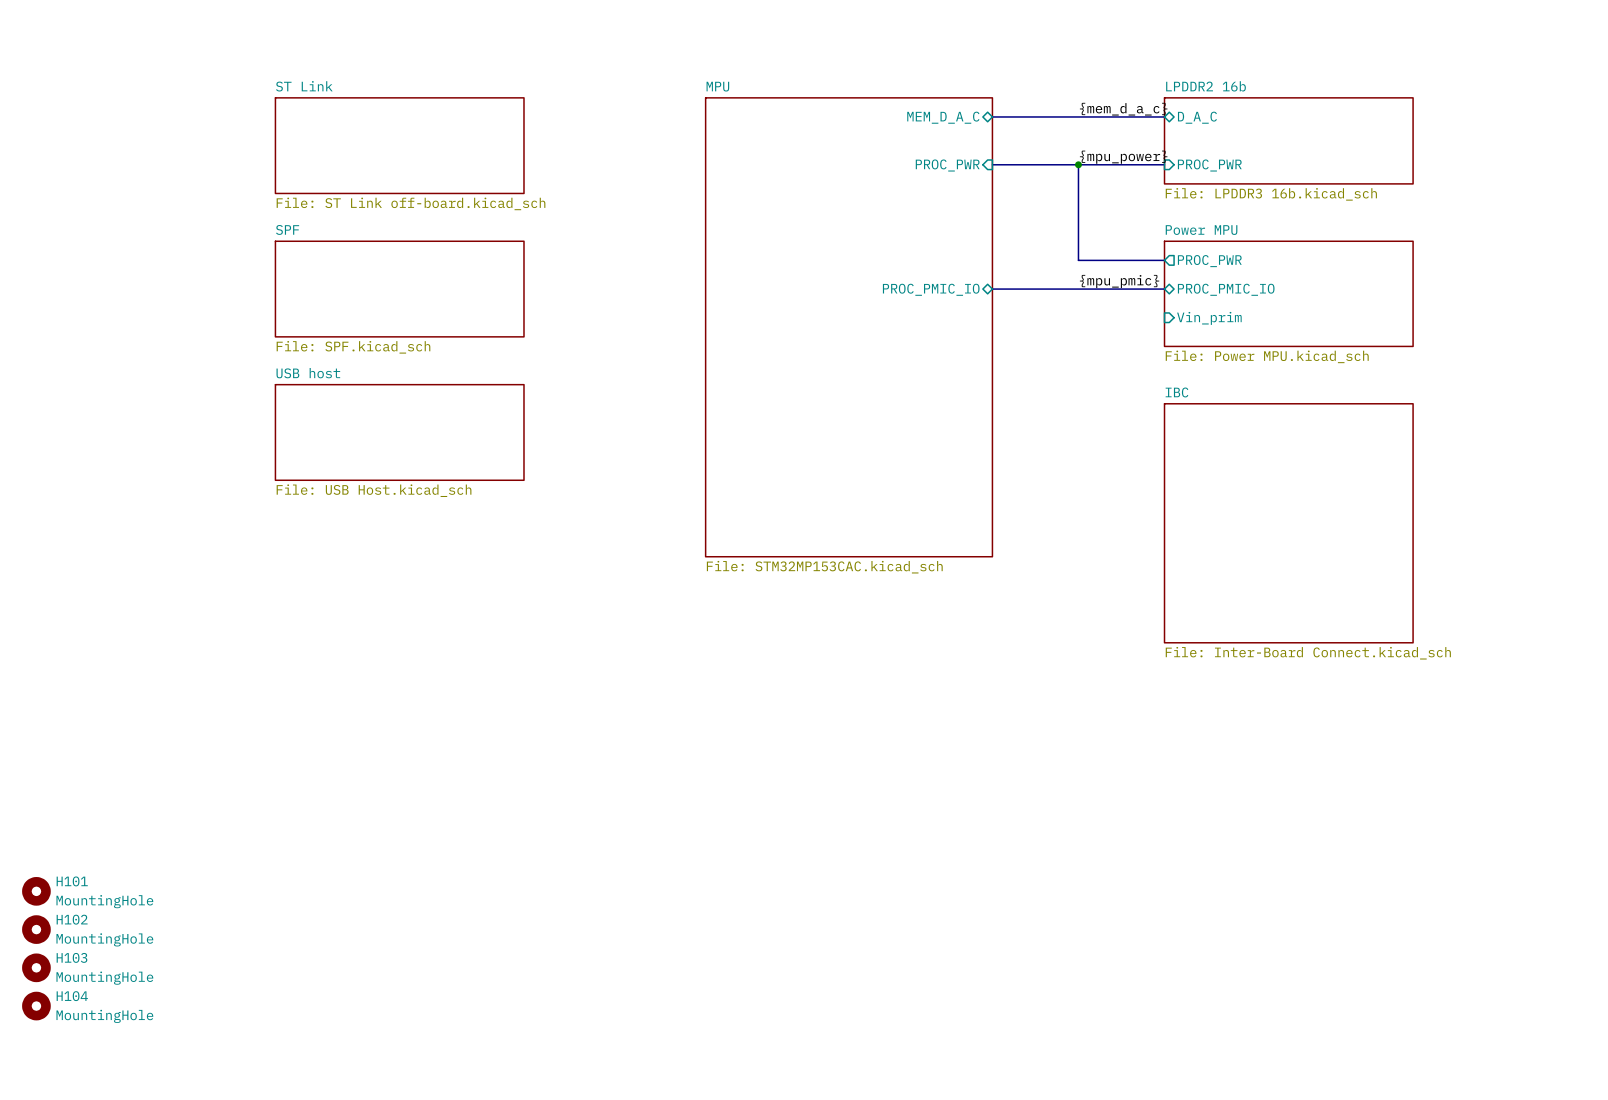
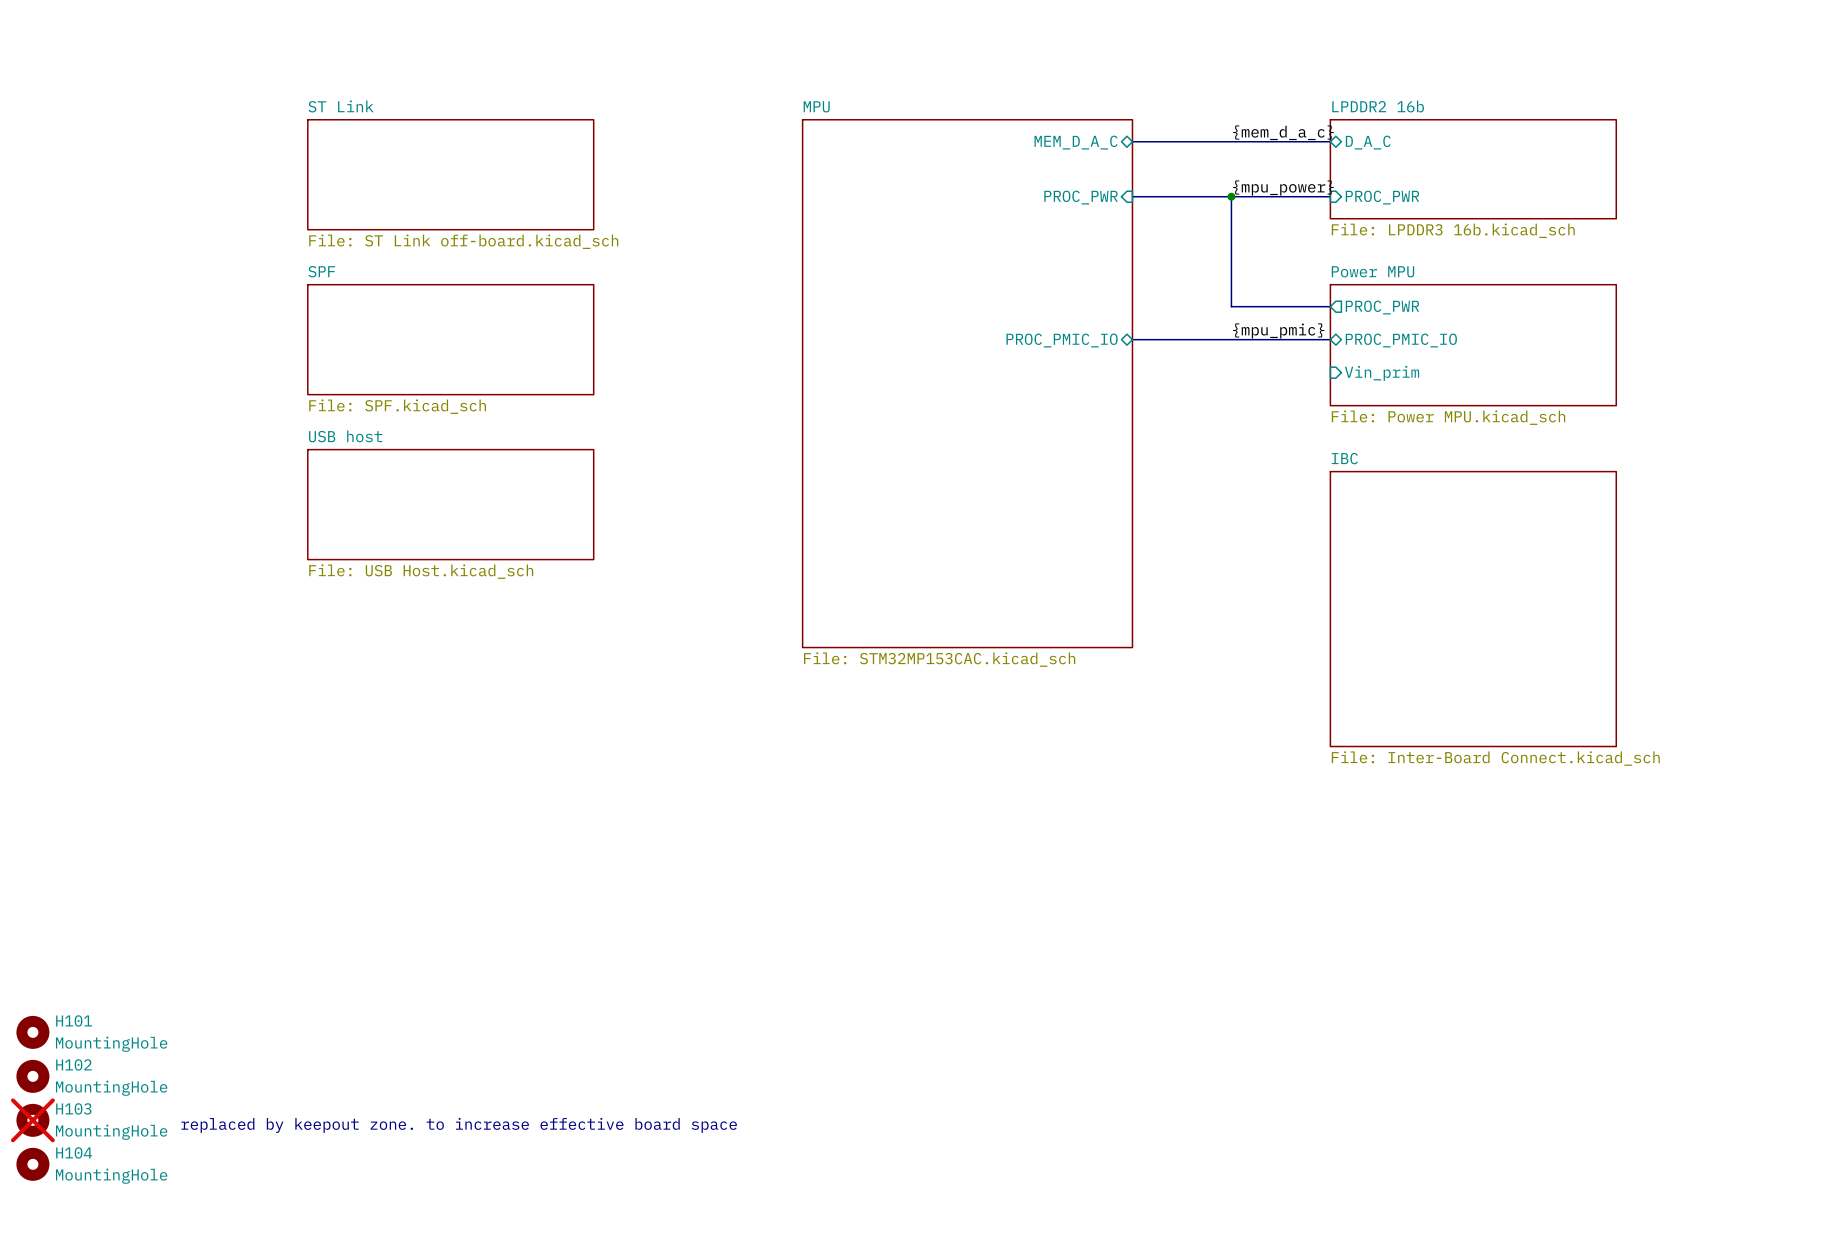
H103 do-not-place cross: none -> (32, 1120)
text: none -> replaced by keepout zone. to increase effective board space (459, 1125)

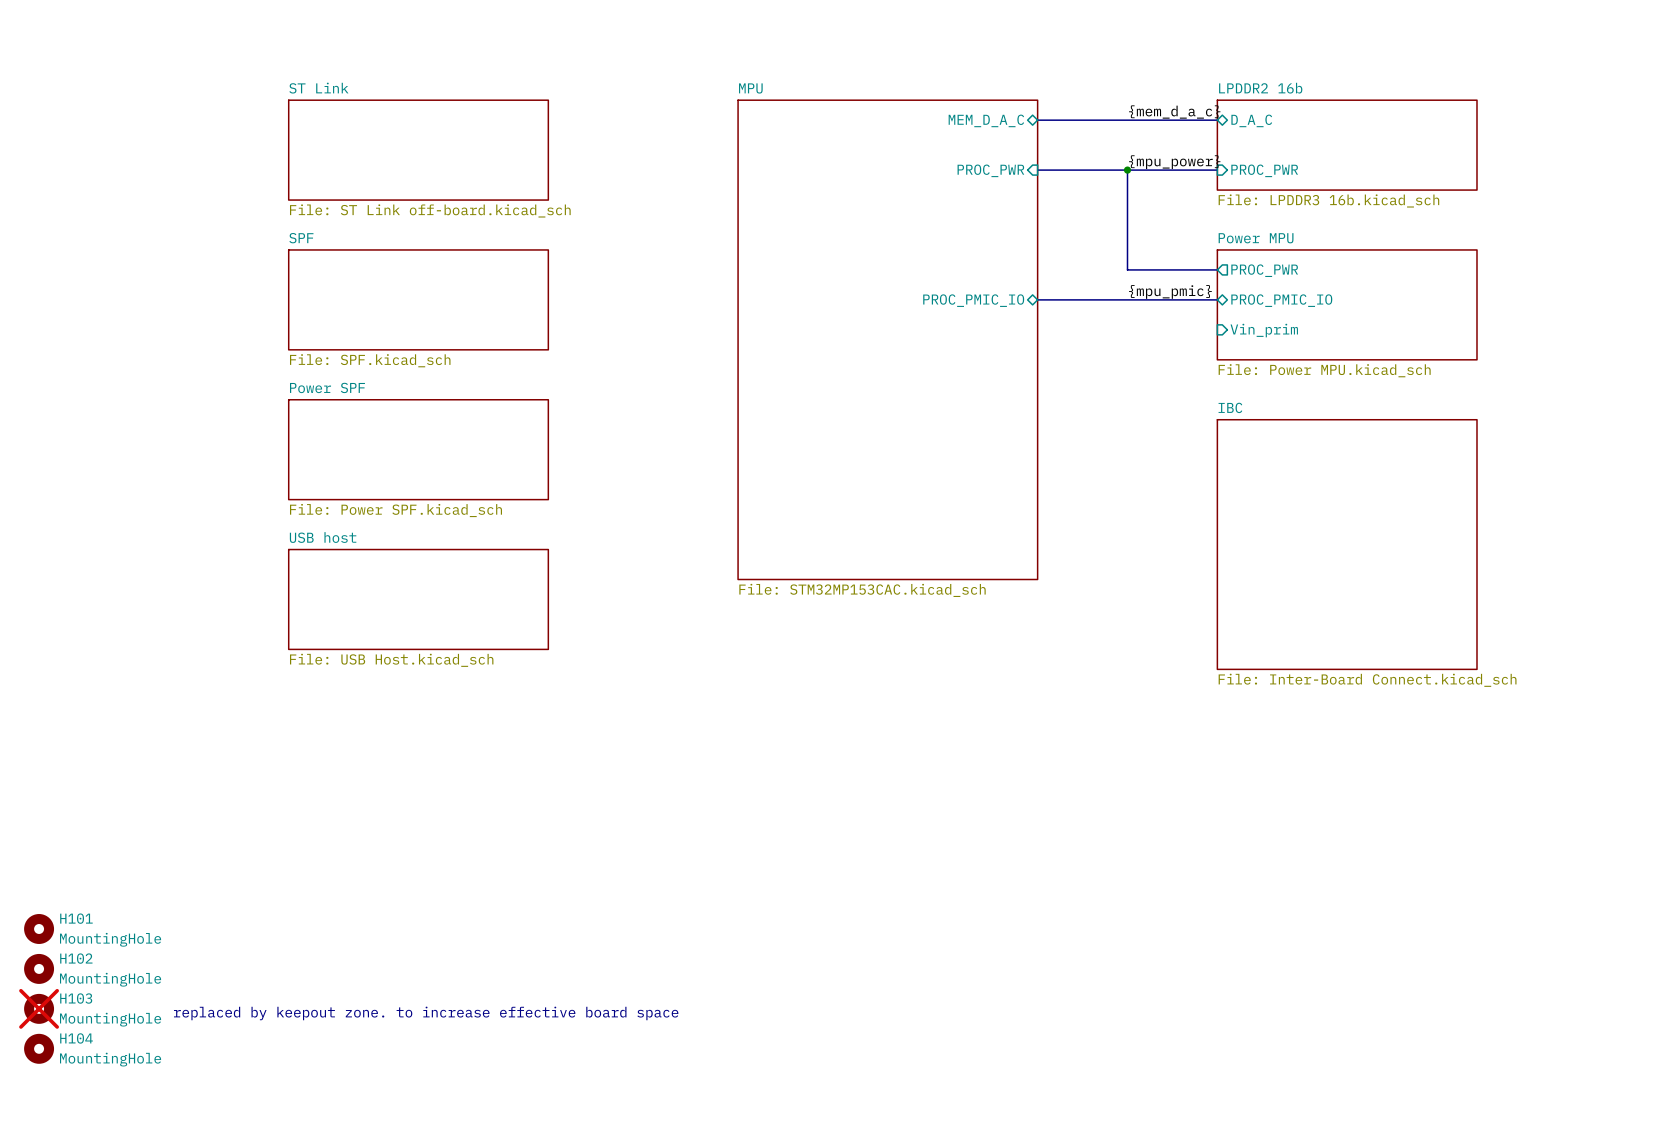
sheet USB host name: USB host (345, 436) -> Power SPF (327, 387)
sheet USB host value: File: USB Host.kicad_sch (421, 571) -> File: Power SPF.kicad_sch (395, 510)
sheet USB host: none -> File: USB Host.kicad_sch (418, 599)

